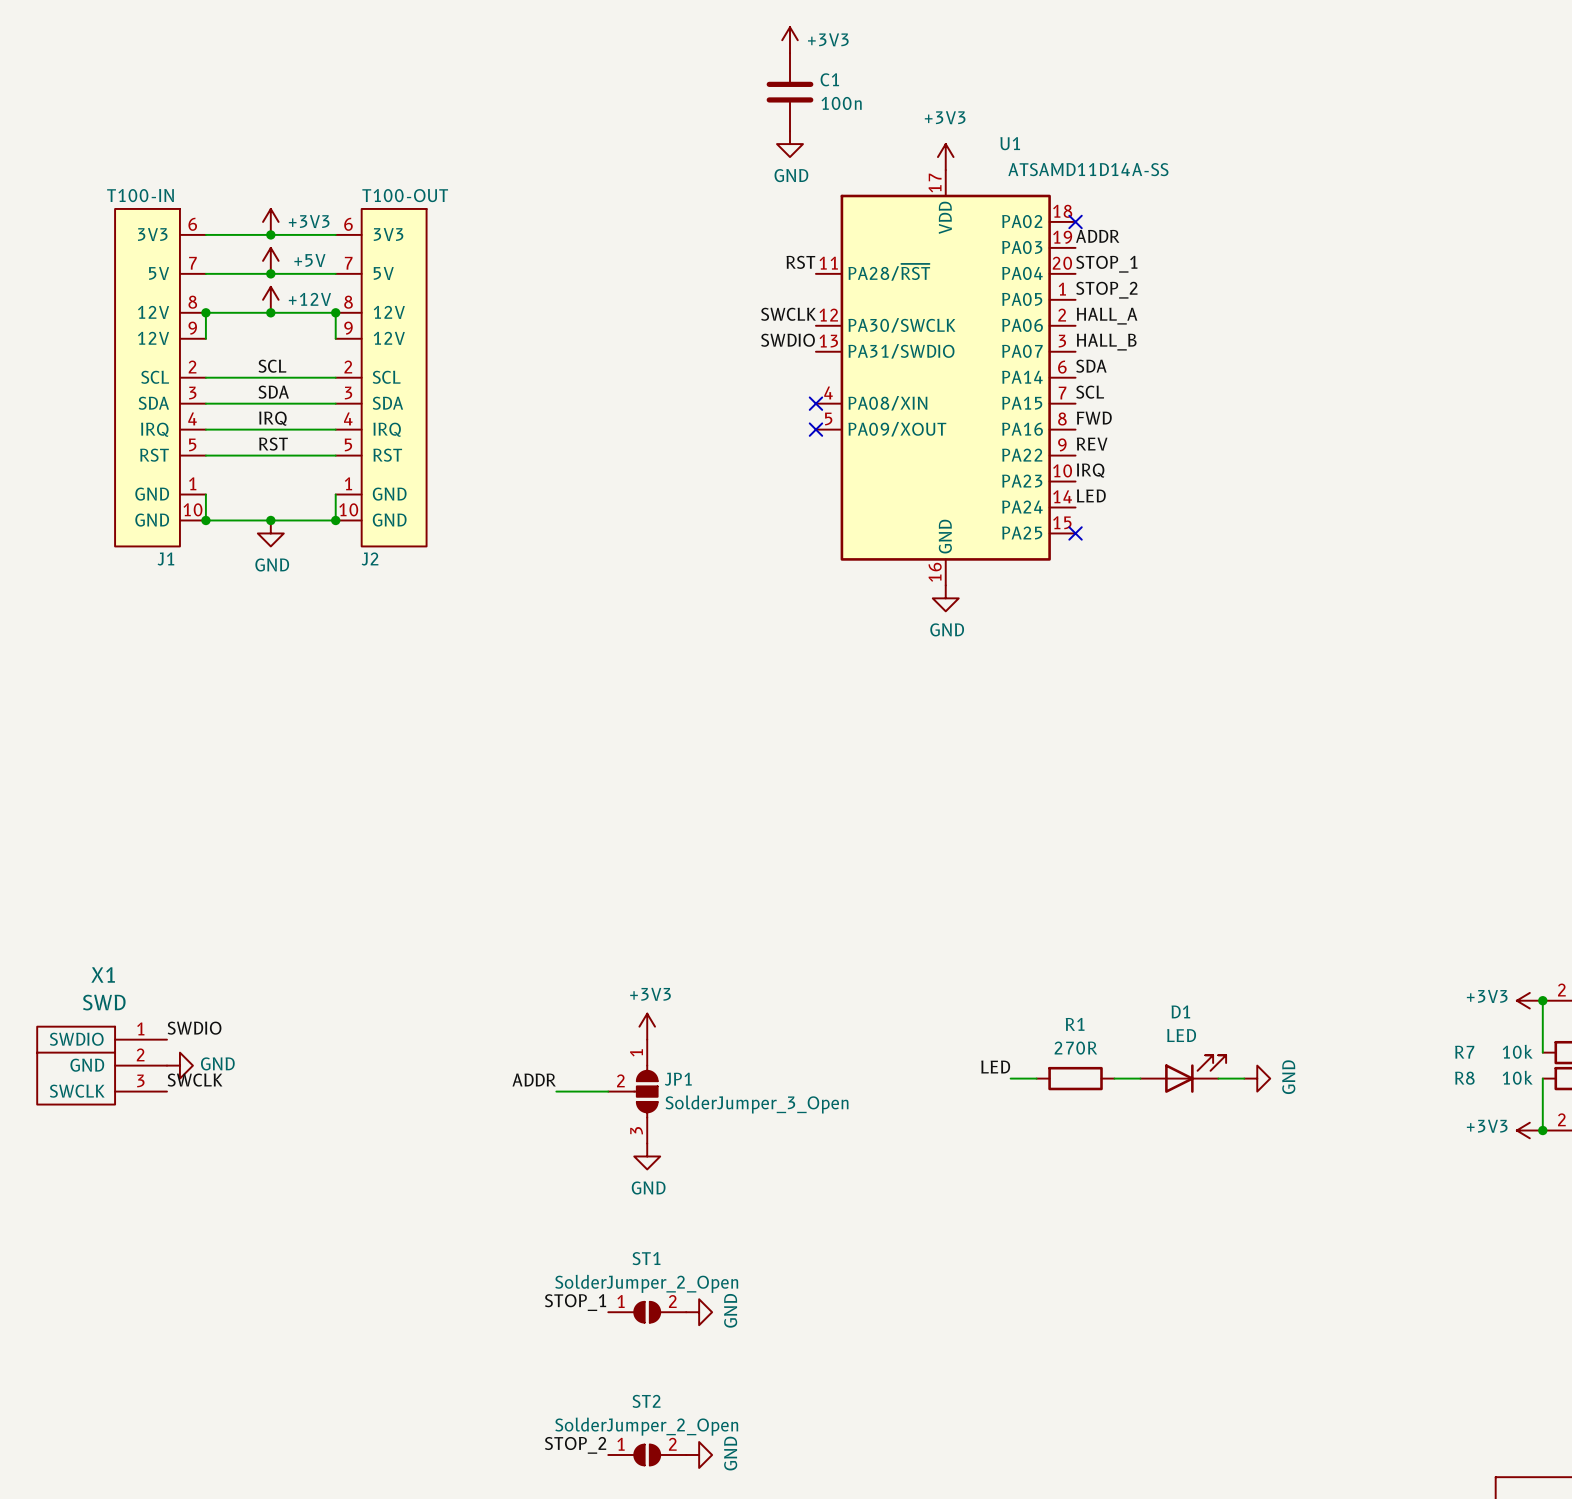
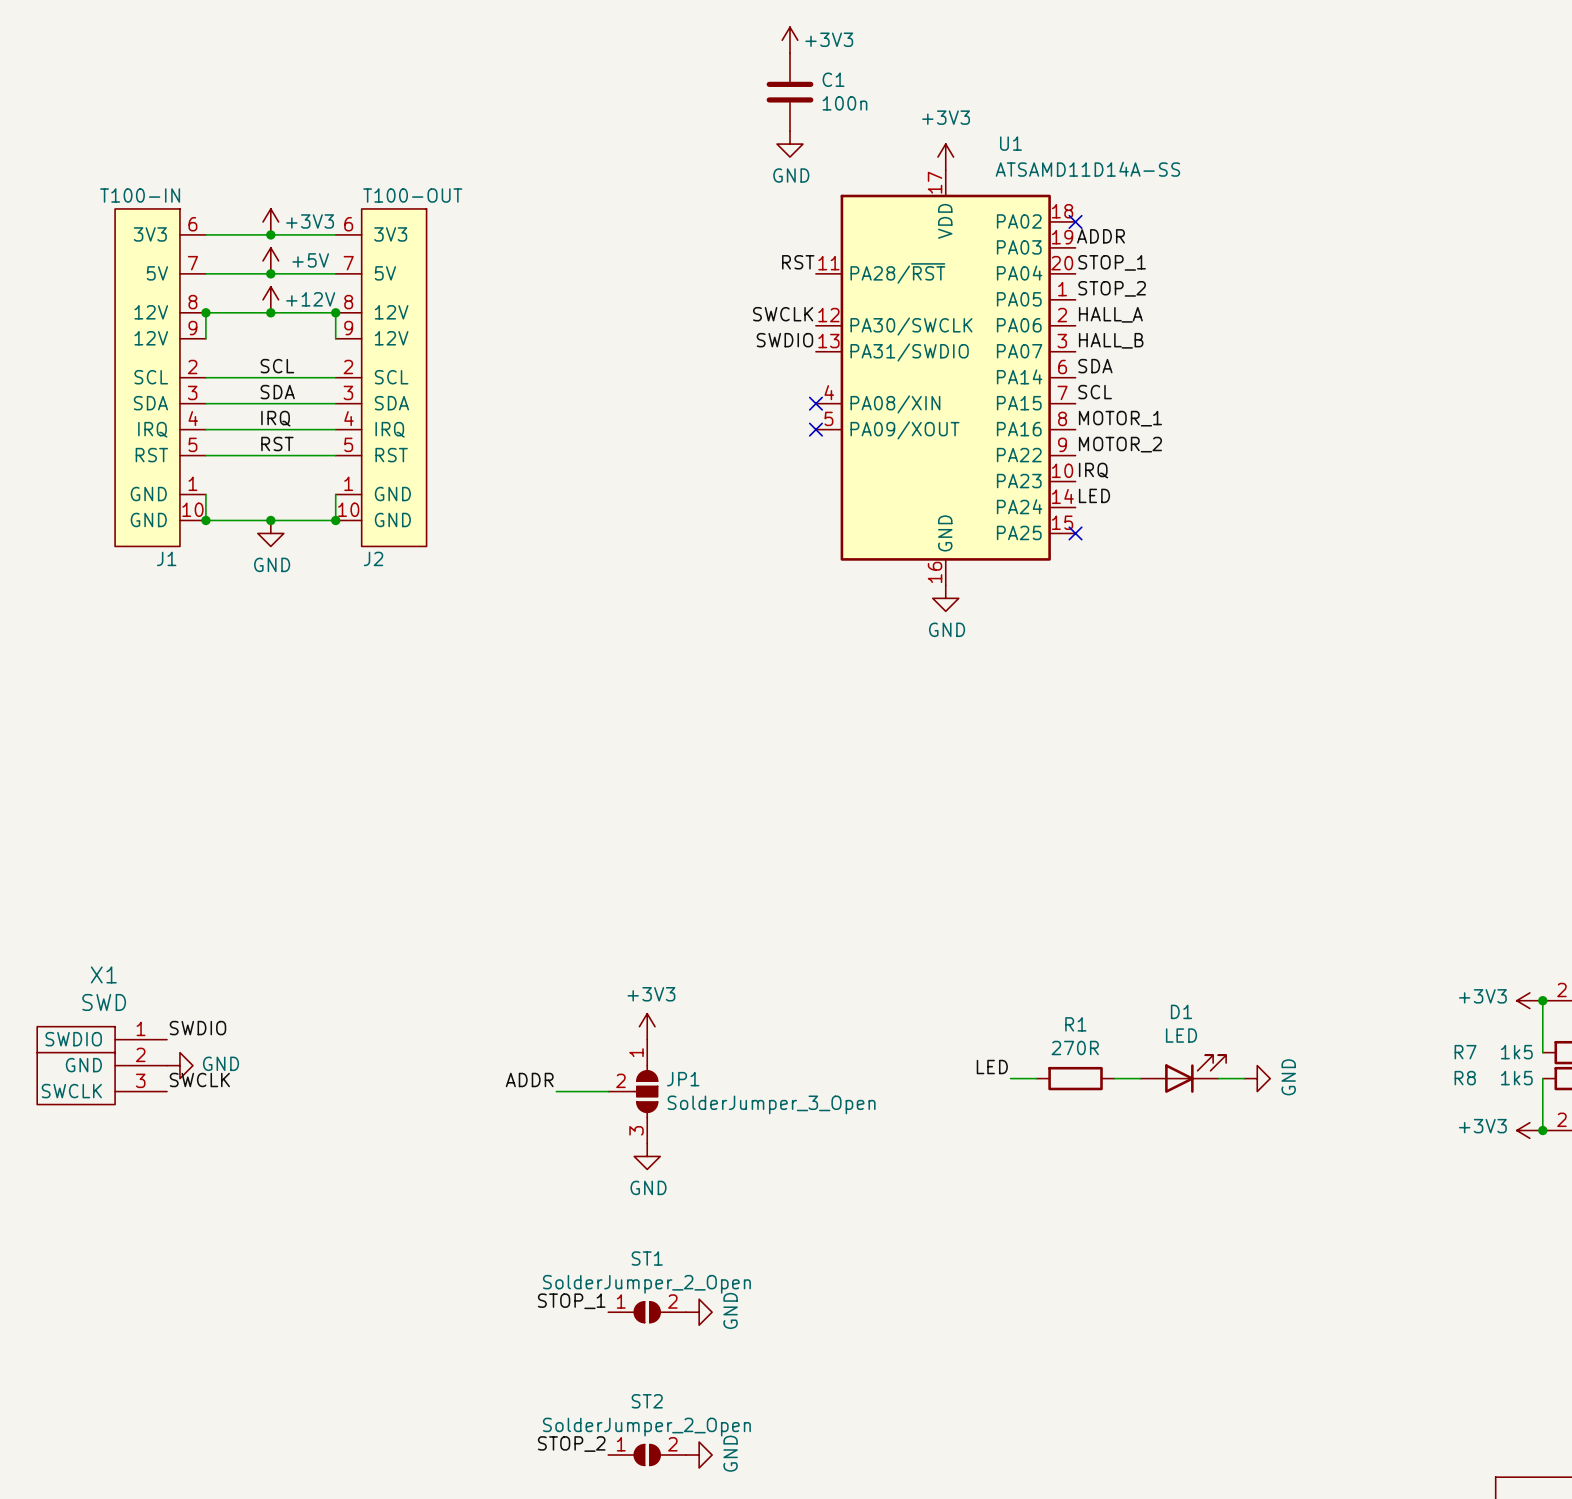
label: FWD (1094, 418) -> MOTOR_1 (1120, 418)
label: REV (1092, 444) -> MOTOR_2 (1120, 444)
R7 value: 10k (1517, 1051) -> 1k5 (1516, 1052)
R8 value: 10k (1517, 1077) -> 1k5 (1516, 1078)

